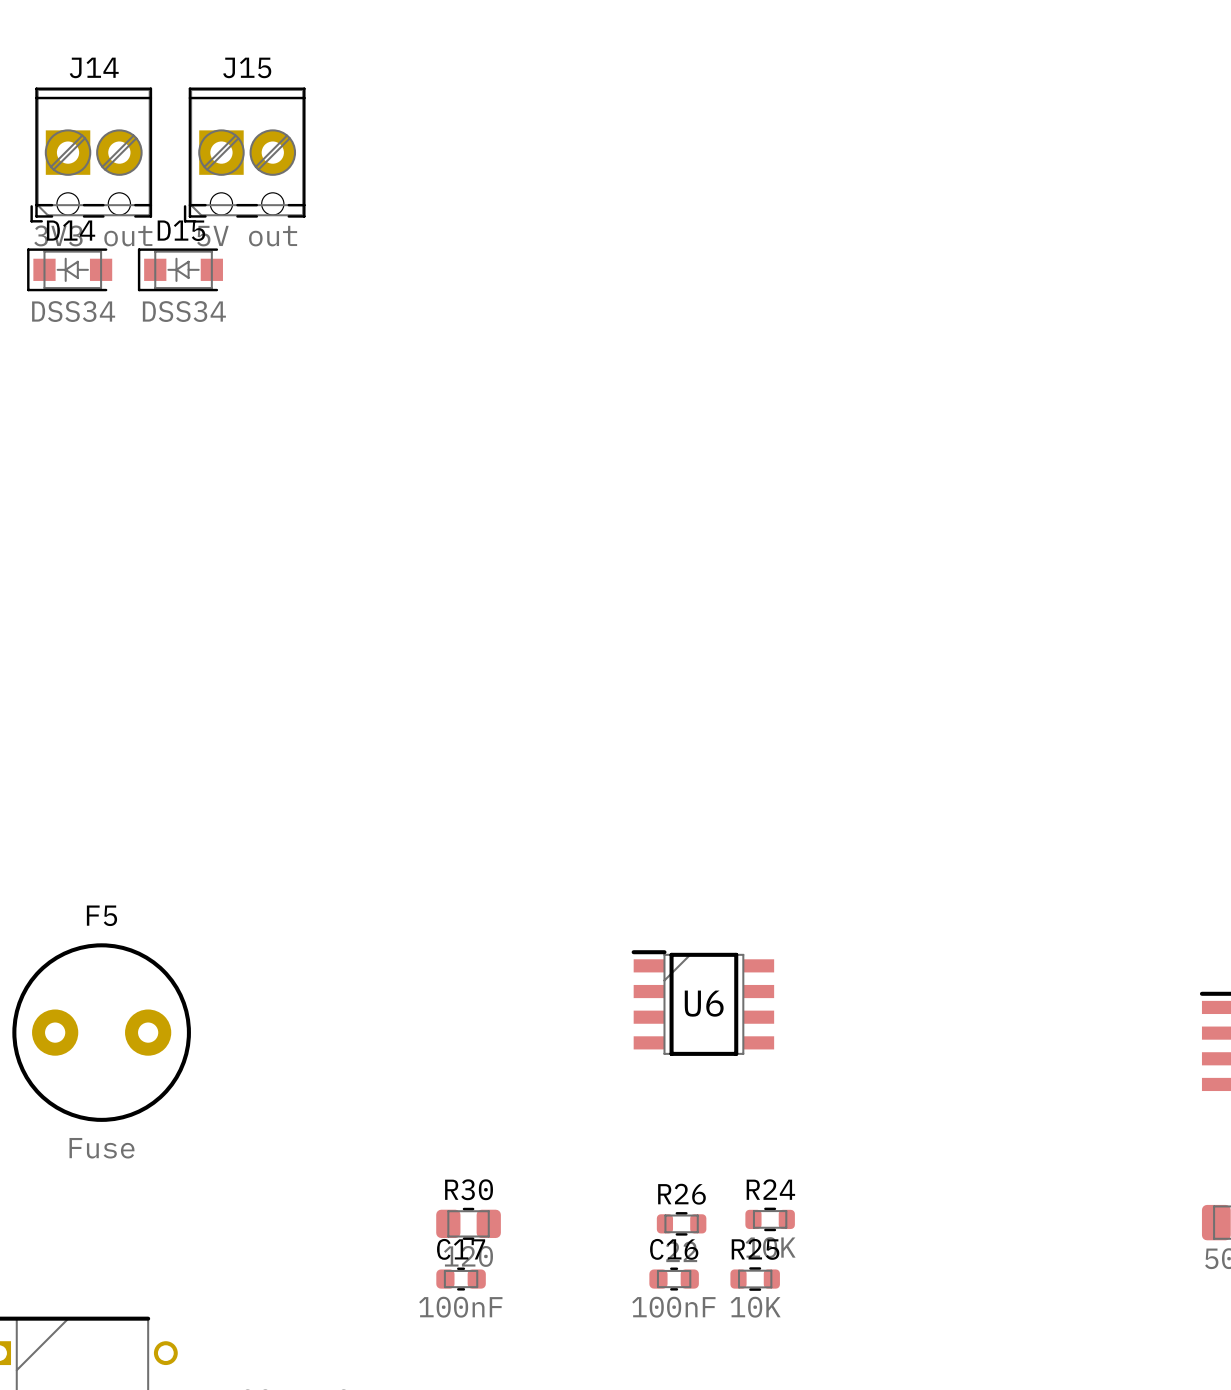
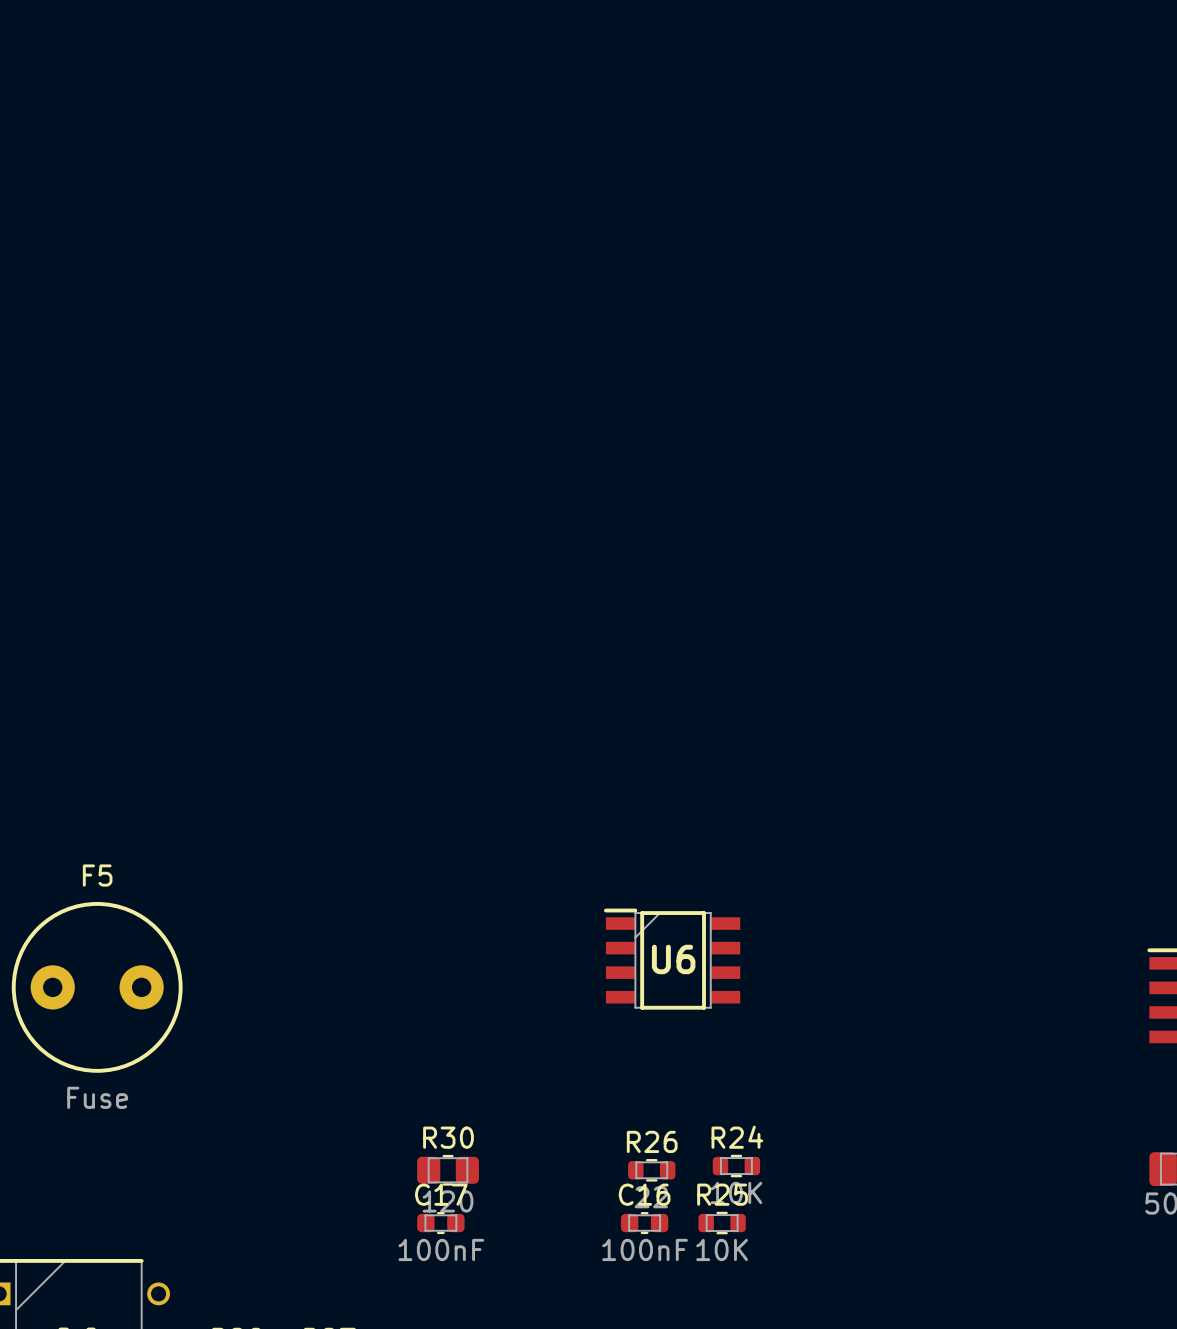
J14: 3V3 out (91, 155) -> none
J15: 5V out (244, 155) -> none
D14: DSS34 (69, 269) -> none
D15: DSS34 (180, 269) -> none

